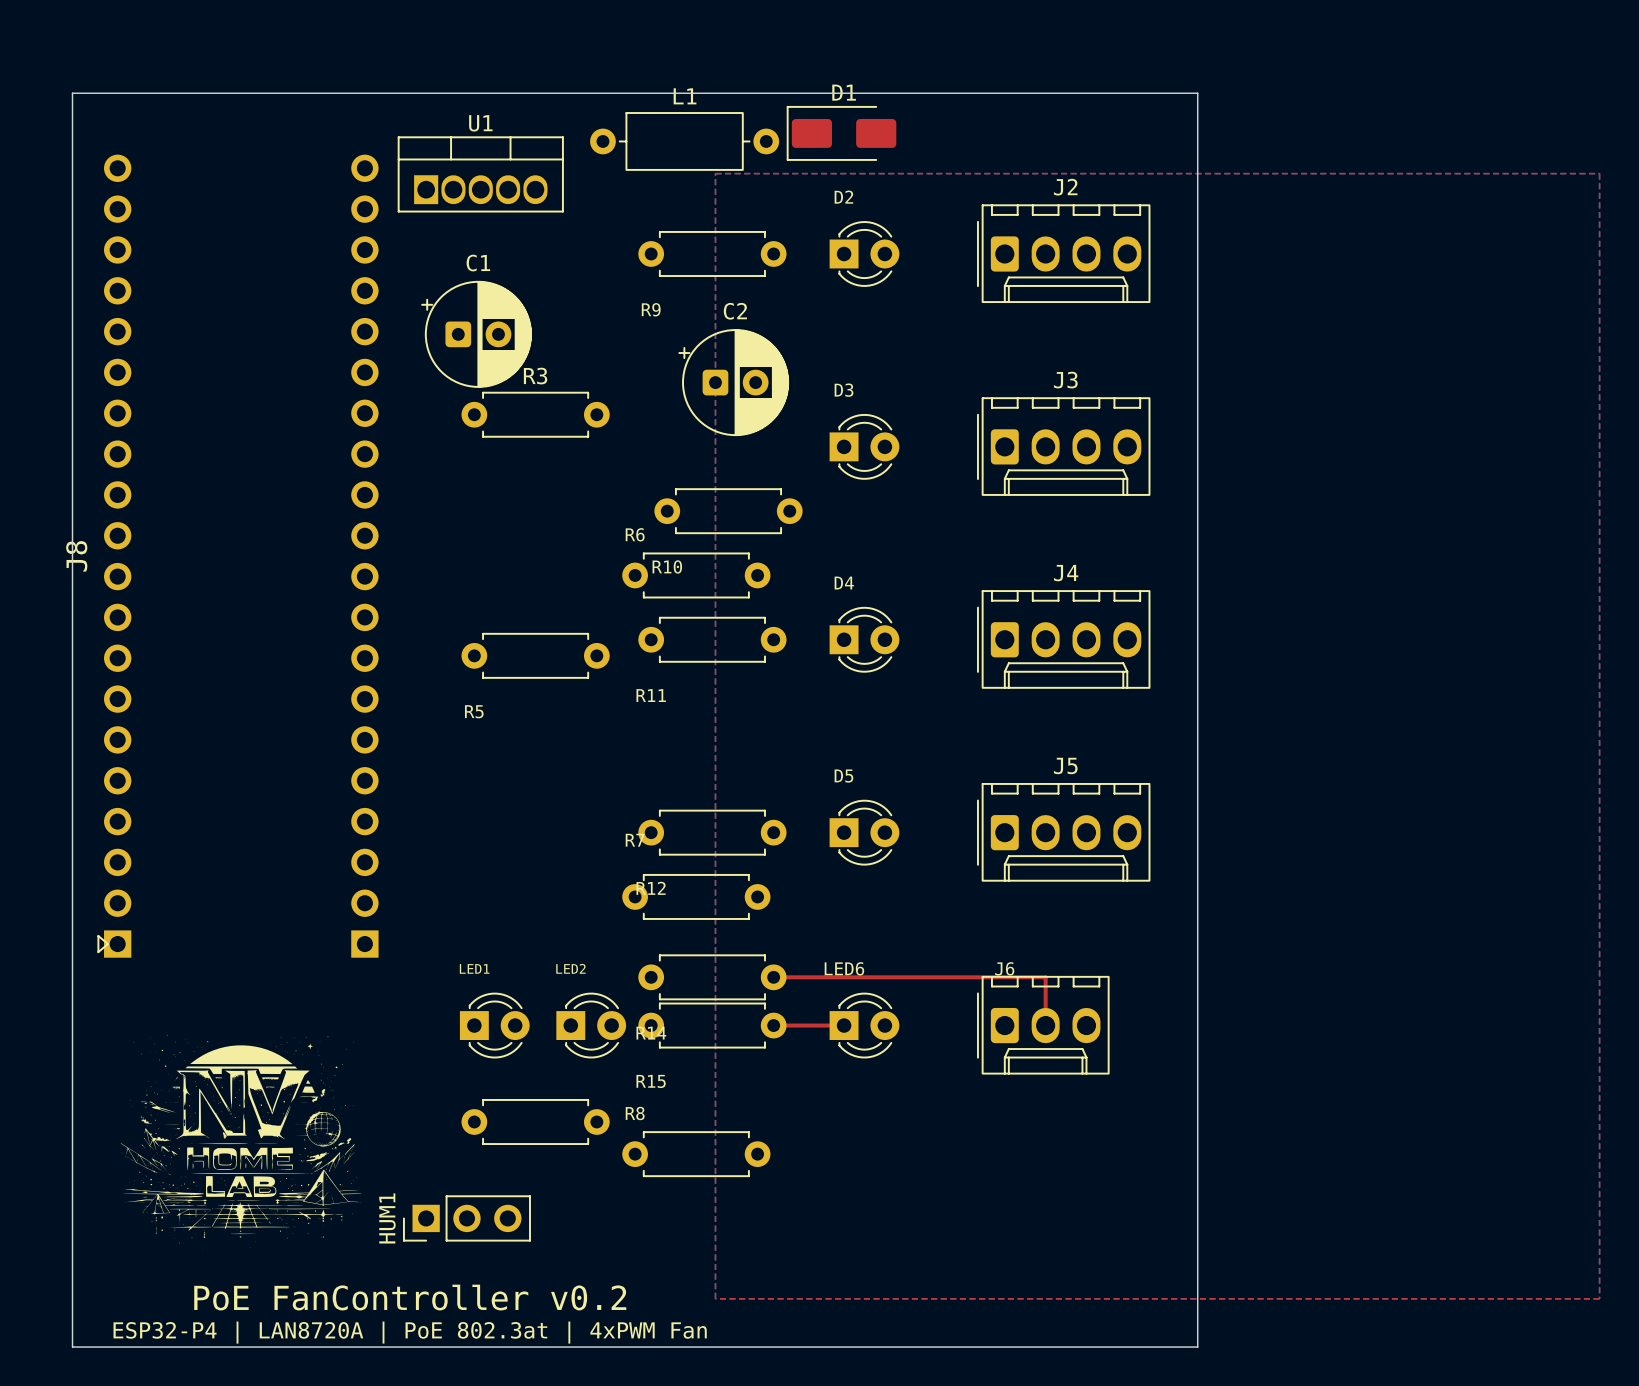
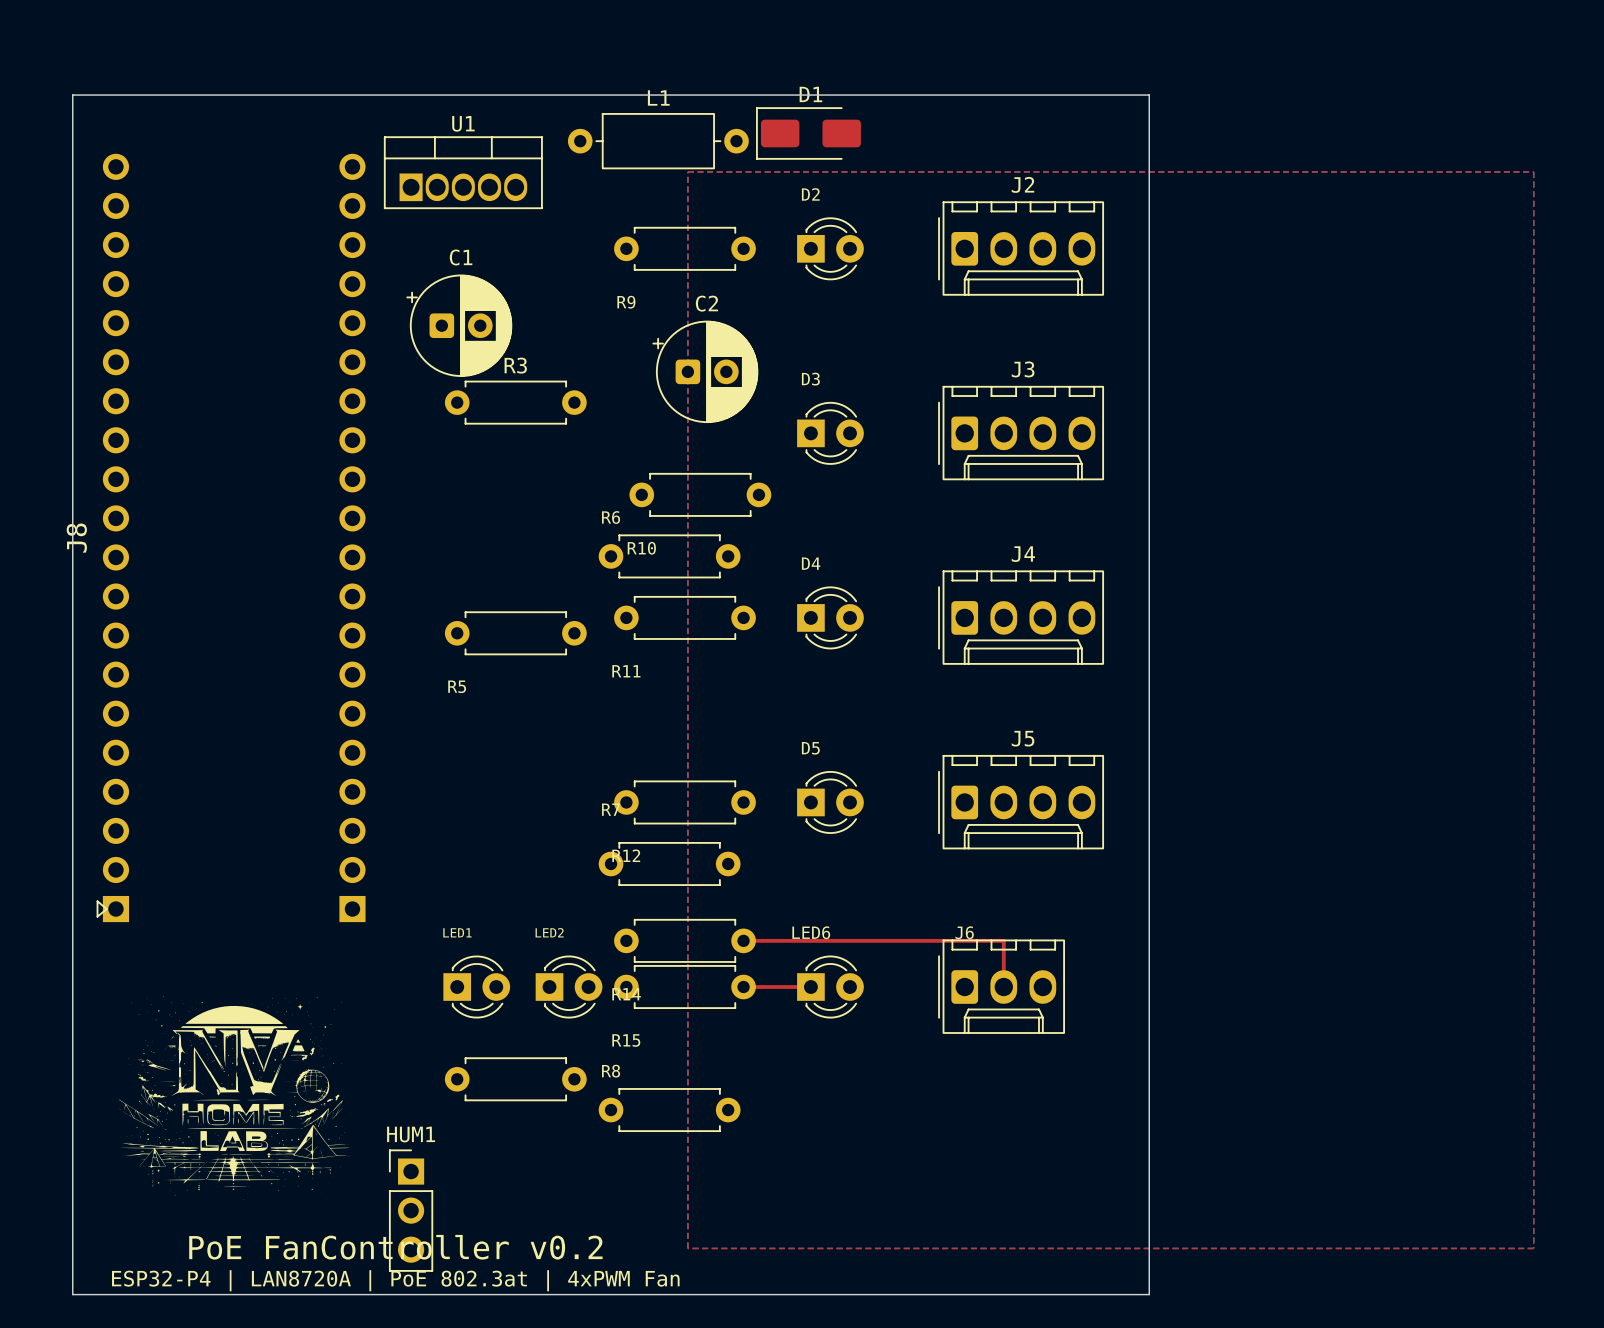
HUM1 rotation: 0° (466, 1218) -> 90° clockwise (411, 1210)

